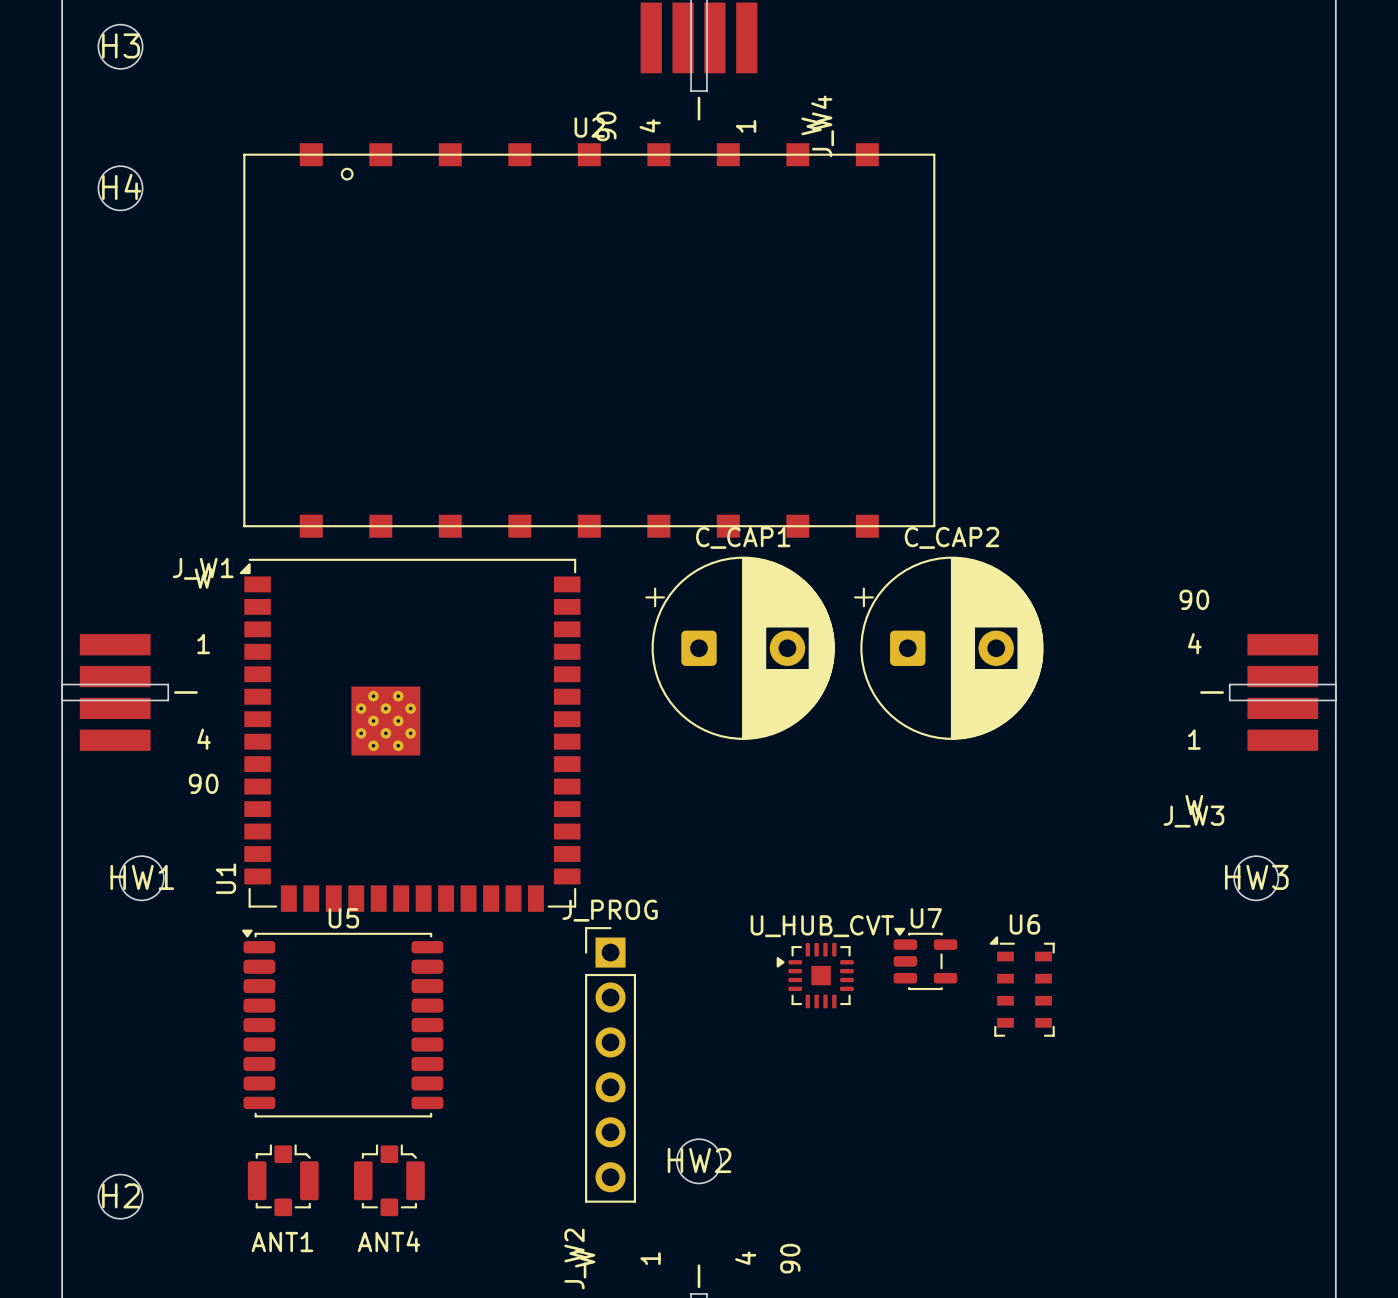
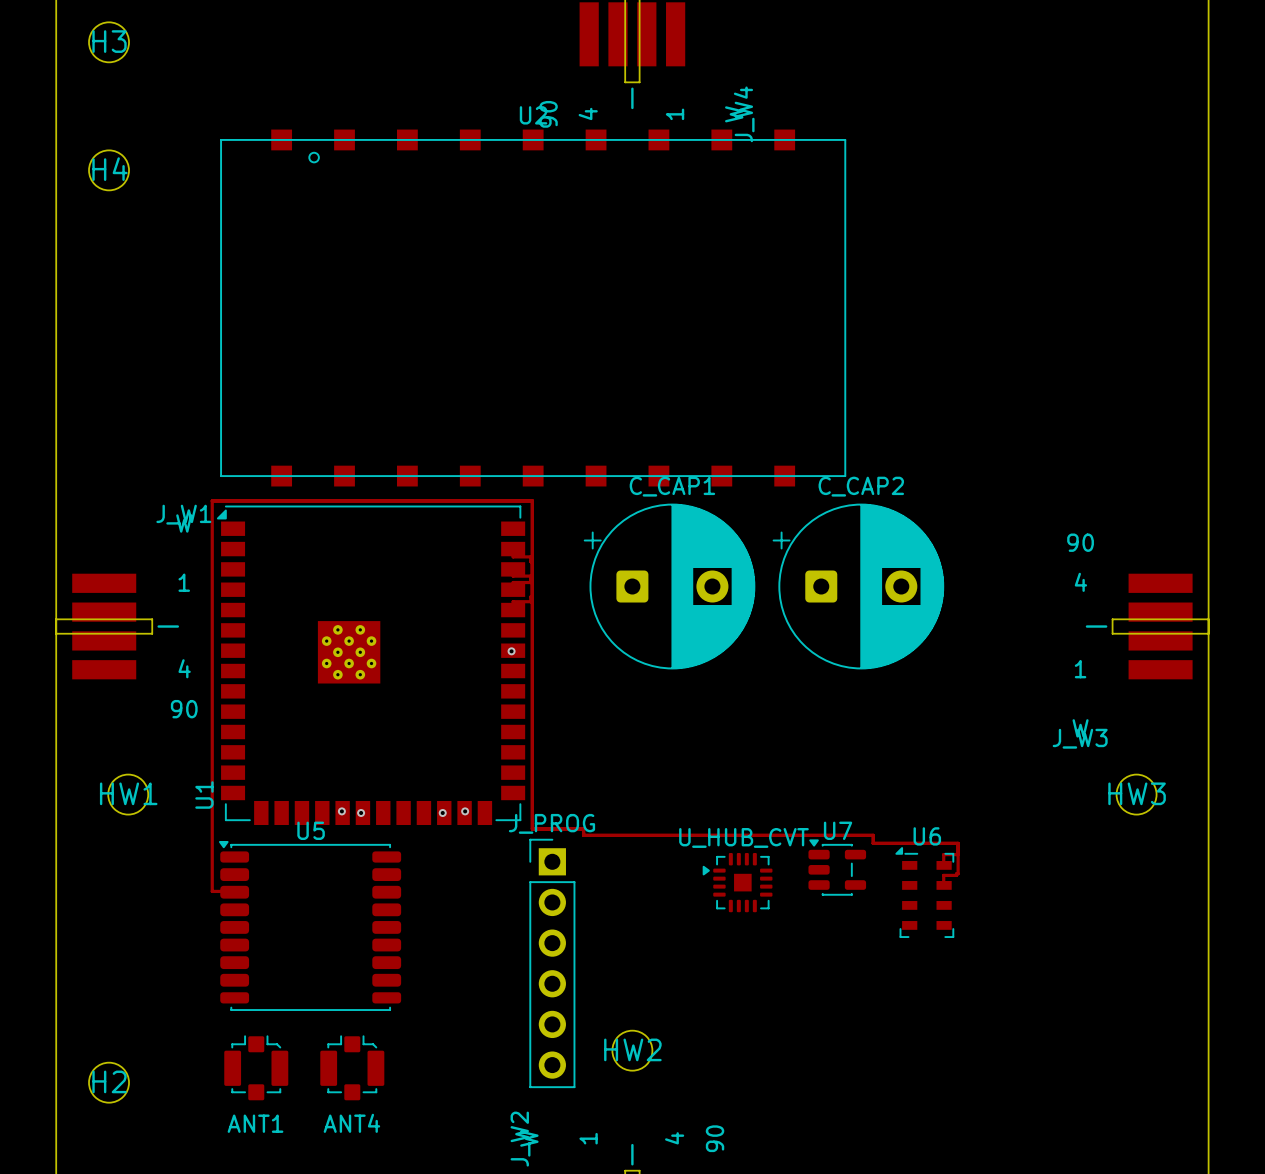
track: none -> (513, 548) (513, 556) (530, 556) (530, 561) (532, 561)
track: none -> (513, 569) (513, 576) (532, 576)
track: none -> (530, 576) (530, 582) (513, 582) (513, 590)
track: none -> (532, 596) (530, 596) (530, 601) (513, 601) (513, 609)
via: none -> (511, 651)
via: none -> (341, 811)
via: none -> (465, 811)
via: none -> (361, 812)
via: none -> (442, 812)
track: none -> (958, 854) (943, 854) (943, 865)
track: none -> (943, 885) (943, 875) (958, 873) (958, 843) (873, 843) (873, 835) (583, 835) (583, 828) (532, 828) (532, 500) (212, 500) (212, 891) (234, 891)

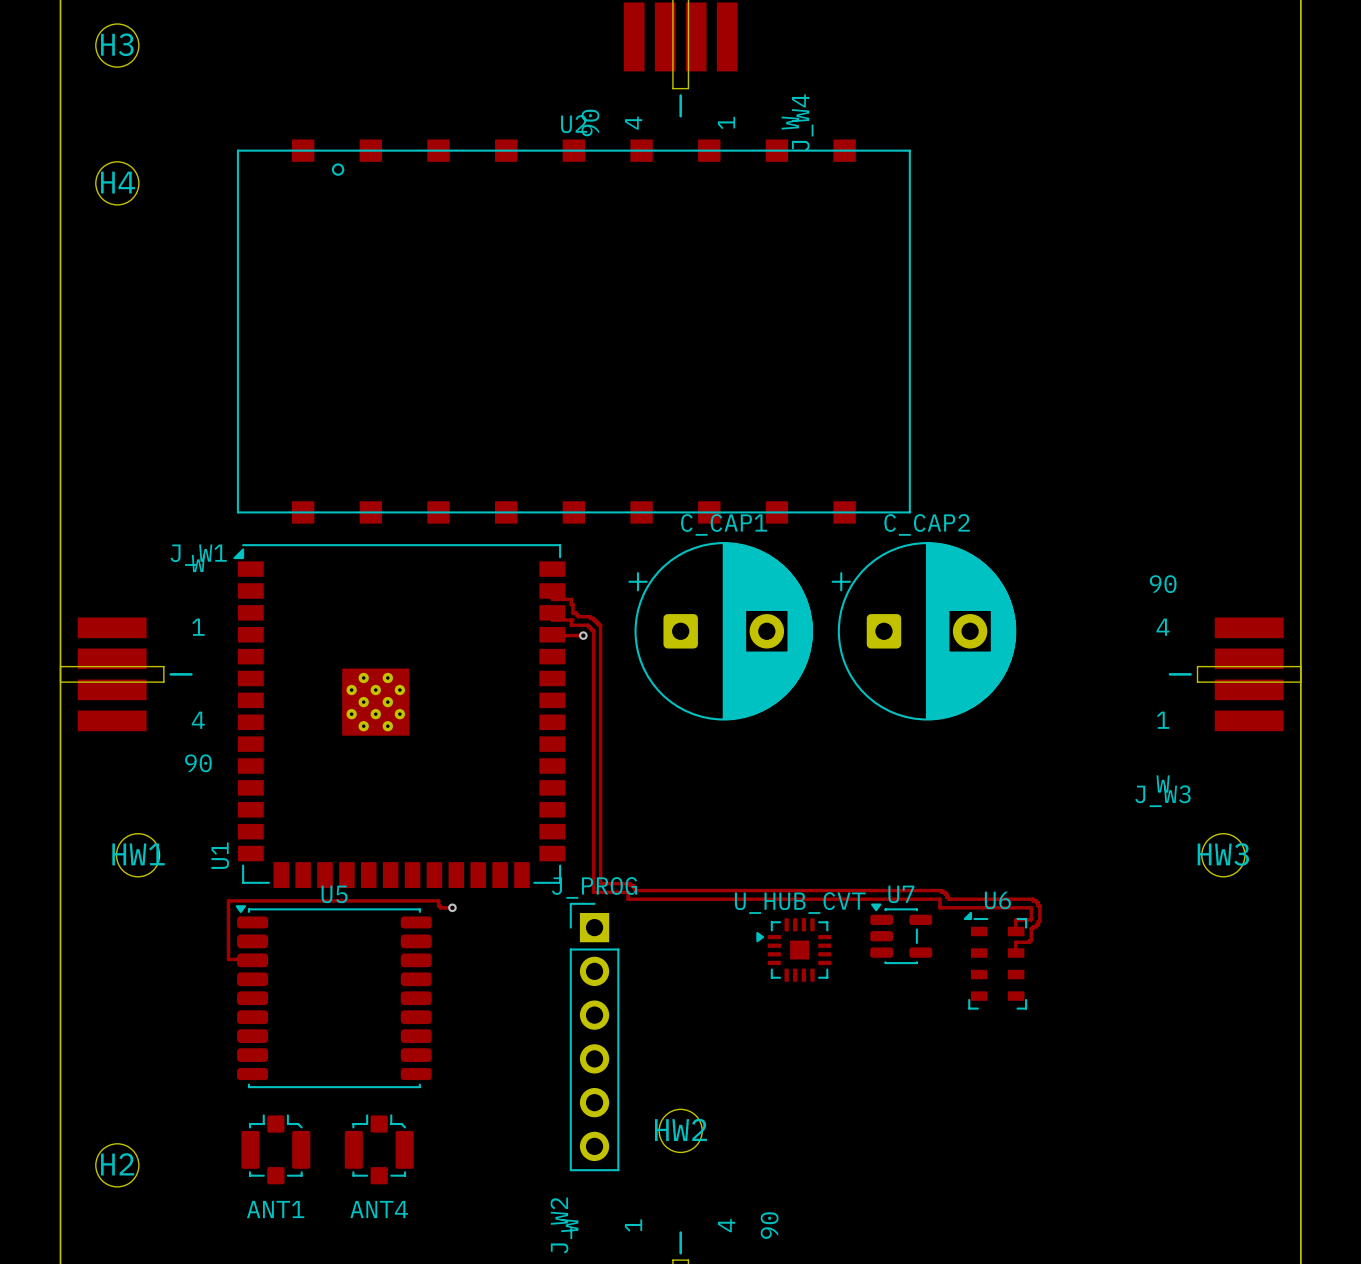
track: (532, 561) (532, 500) (212, 500) (212, 837) -> (452, 907) (440, 907) (438, 900) (228, 900)
track: (532, 569) (532, 828) (551, 828) -> (573, 625) (588, 625) (593, 630) (593, 892)
track: (530, 580) (530, 582) (513, 582) (513, 590) -> (583, 635) (552, 635)
track: (532, 596) (530, 596) (530, 601) (513, 601) (513, 609) -> none
via position: (511, 651) -> (583, 635)
via: (341, 811) -> none
via: (465, 811) -> none
via: (361, 812) -> none
via: (442, 812) -> none
via: none -> (452, 907)
track: (958, 854) (958, 862) -> (573, 613) (576, 613) (578, 616) (590, 616) (600, 625) (600, 883) (629, 883) (635, 887) (635, 890) (941, 890) (946, 894) (948, 899) (1032, 899) (1039, 906) (1039, 921) (1036, 926) (1031, 928)

